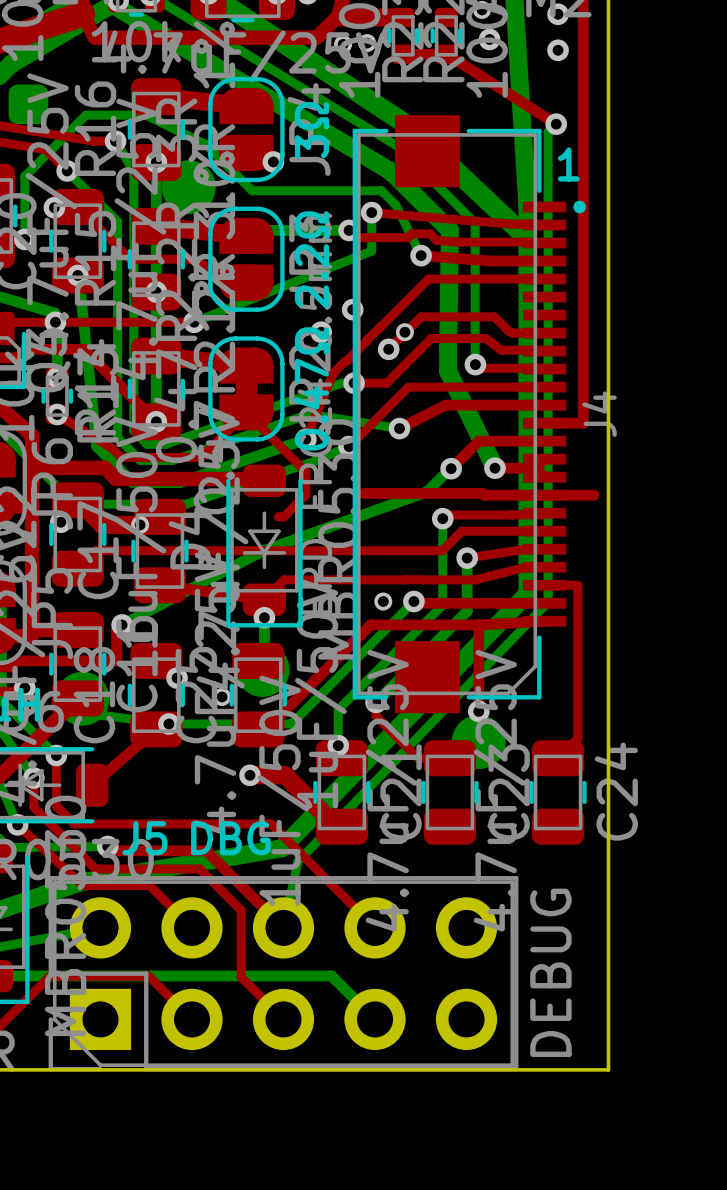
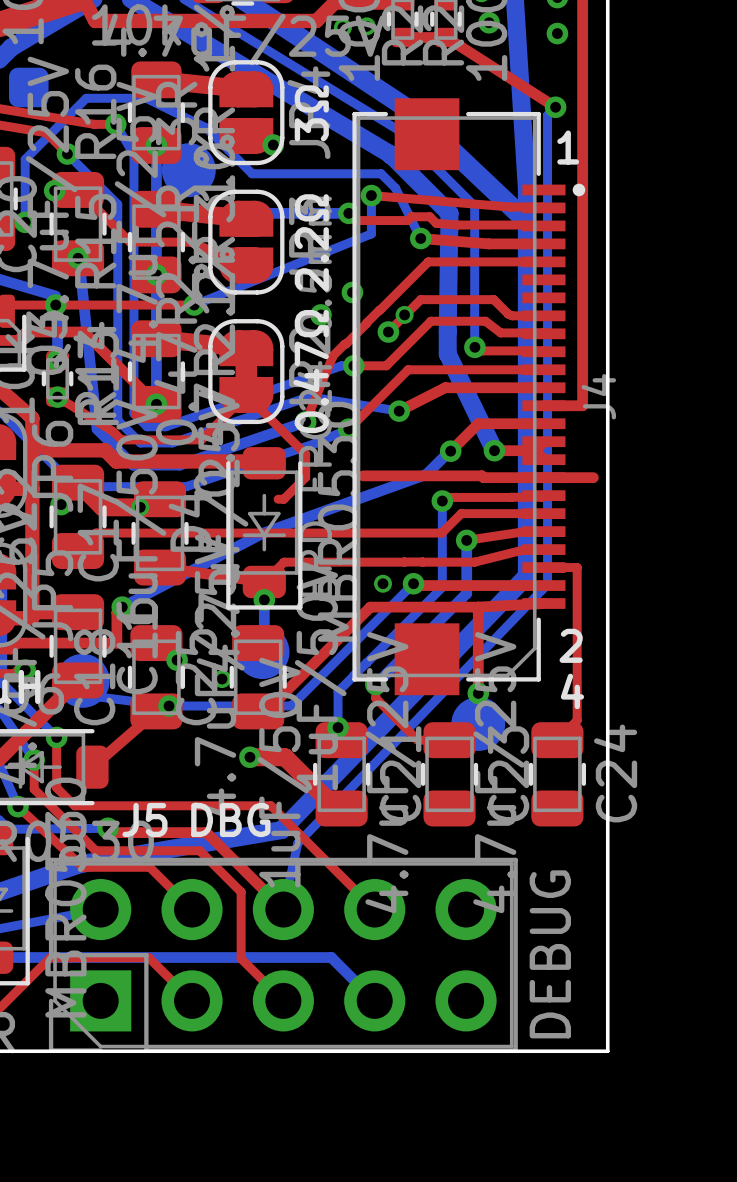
text: none -> 2 (571, 645)
text: none -> 4 (572, 691)

